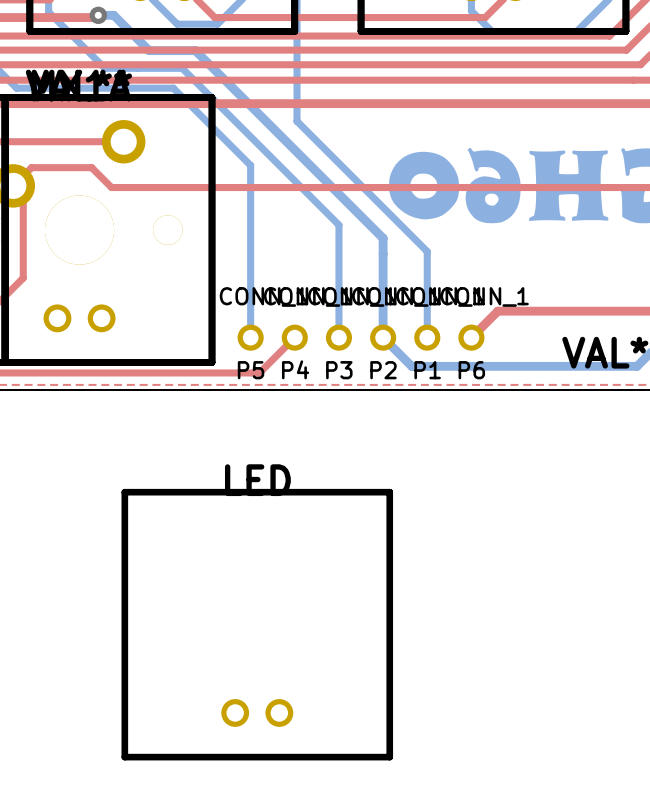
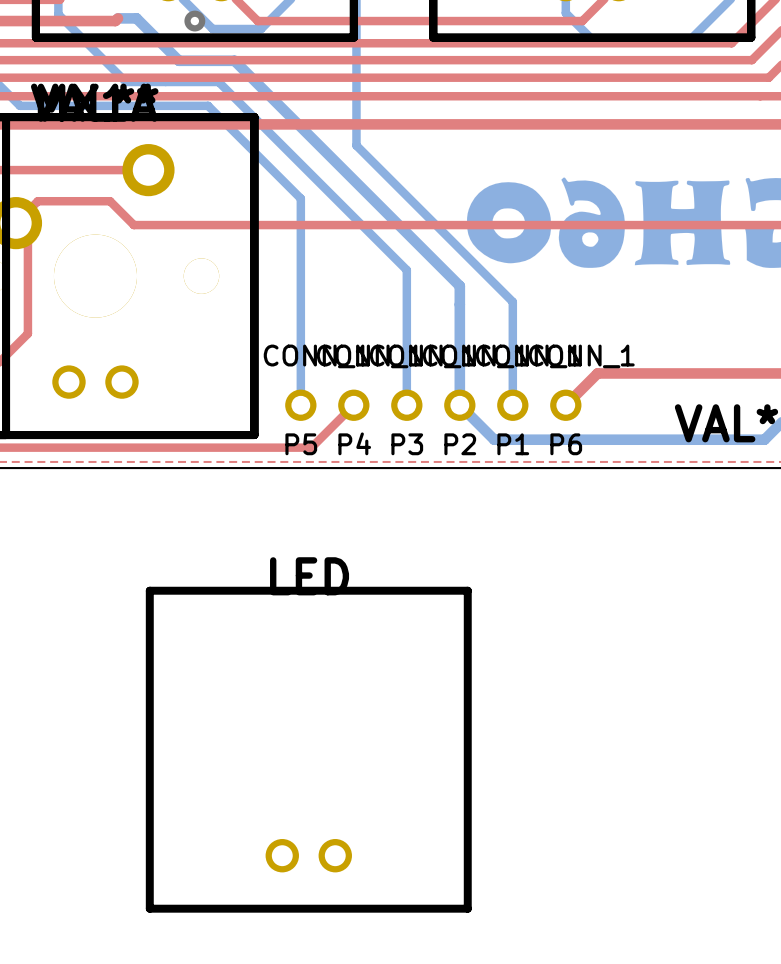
via position: (98, 15) -> (194, 21)

